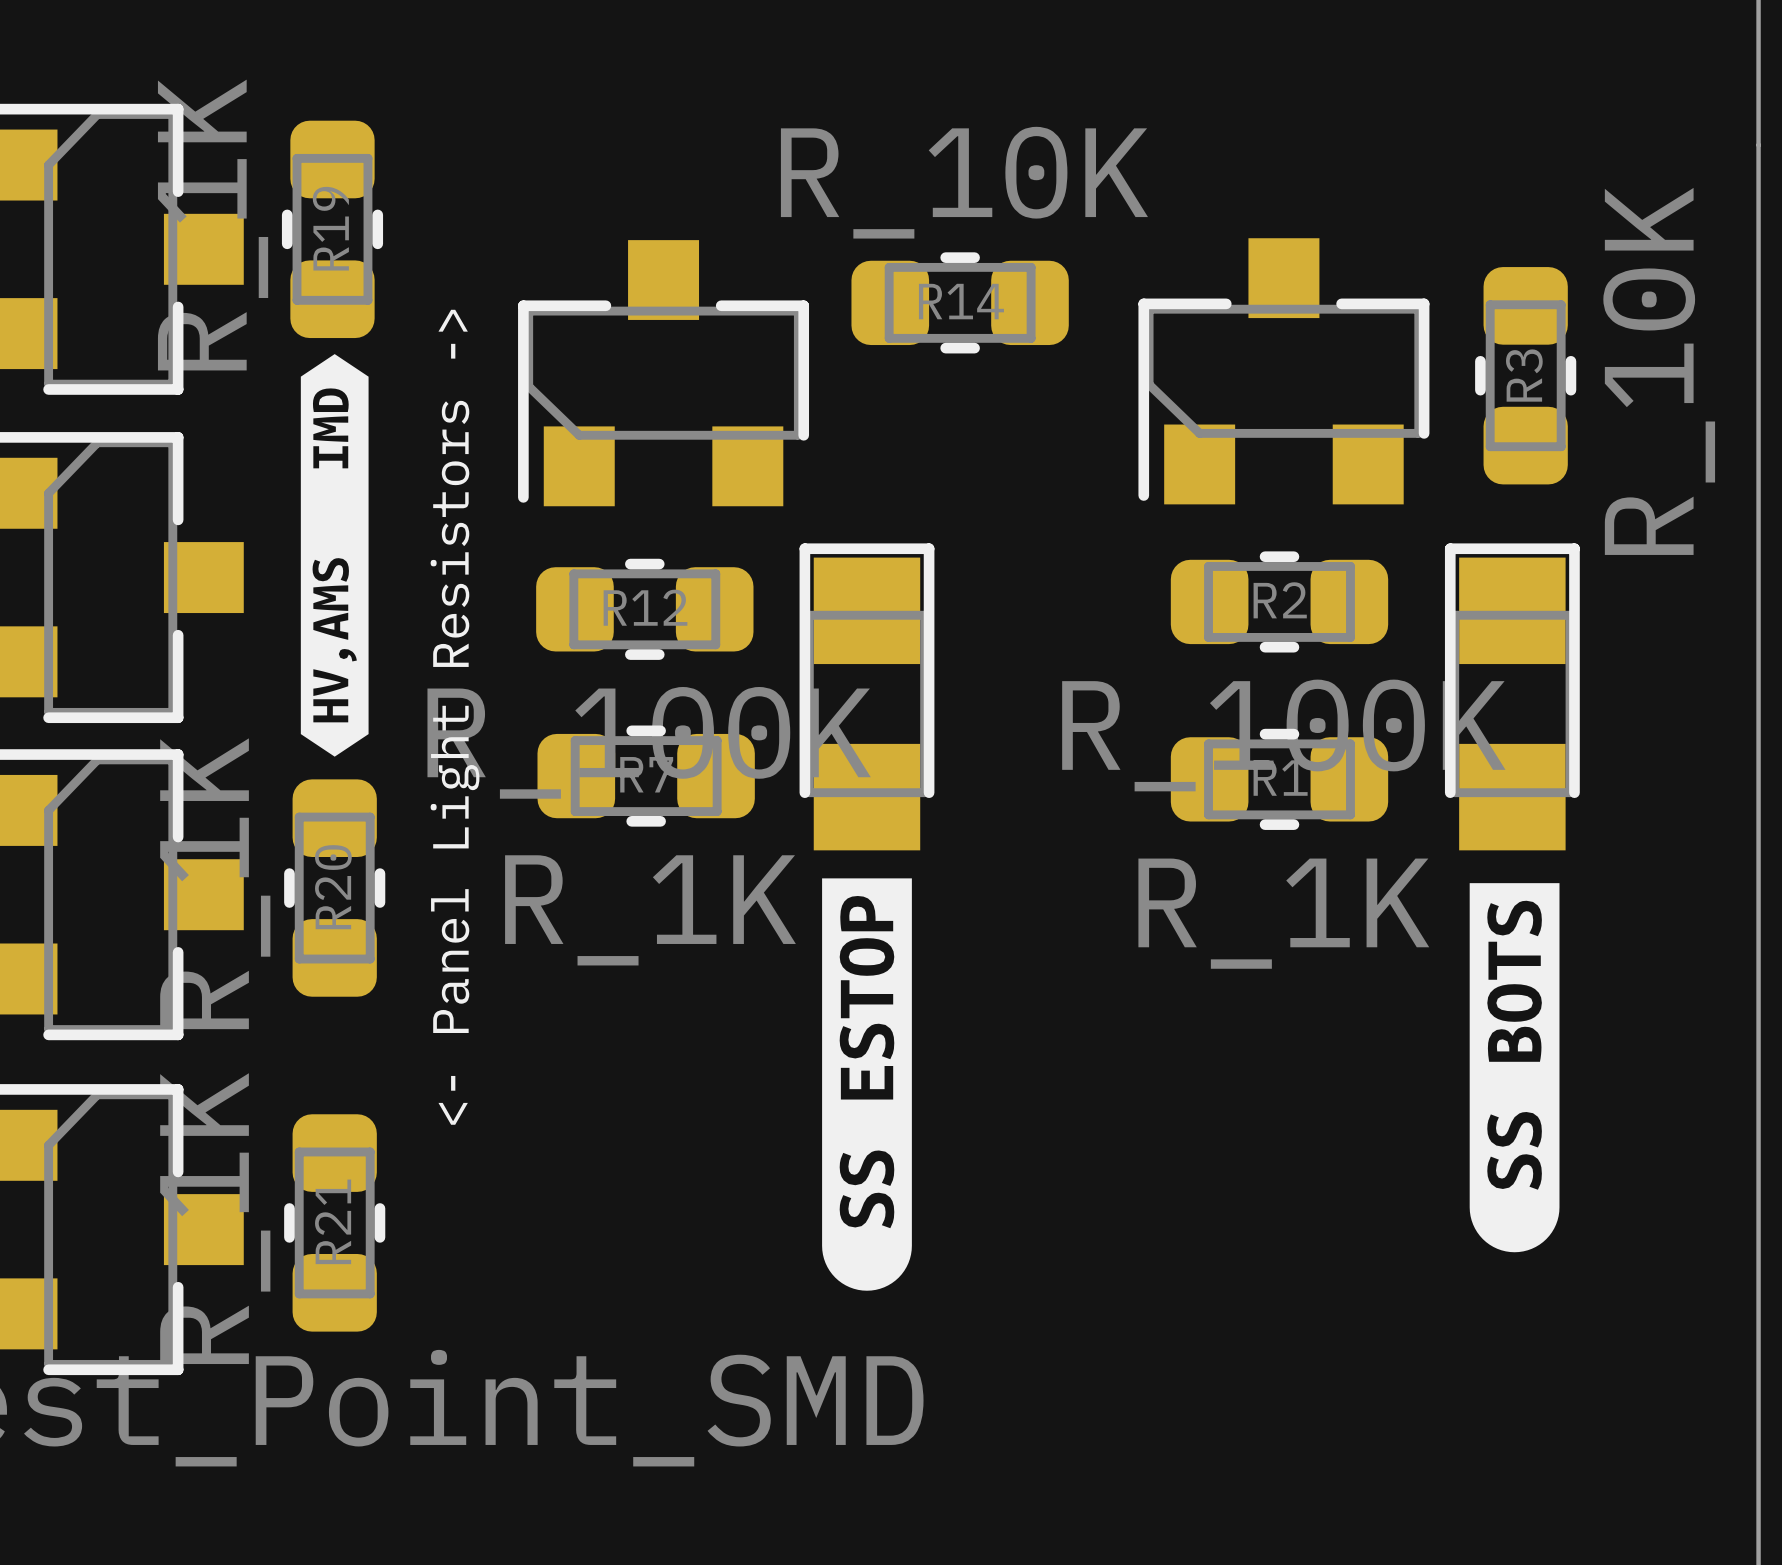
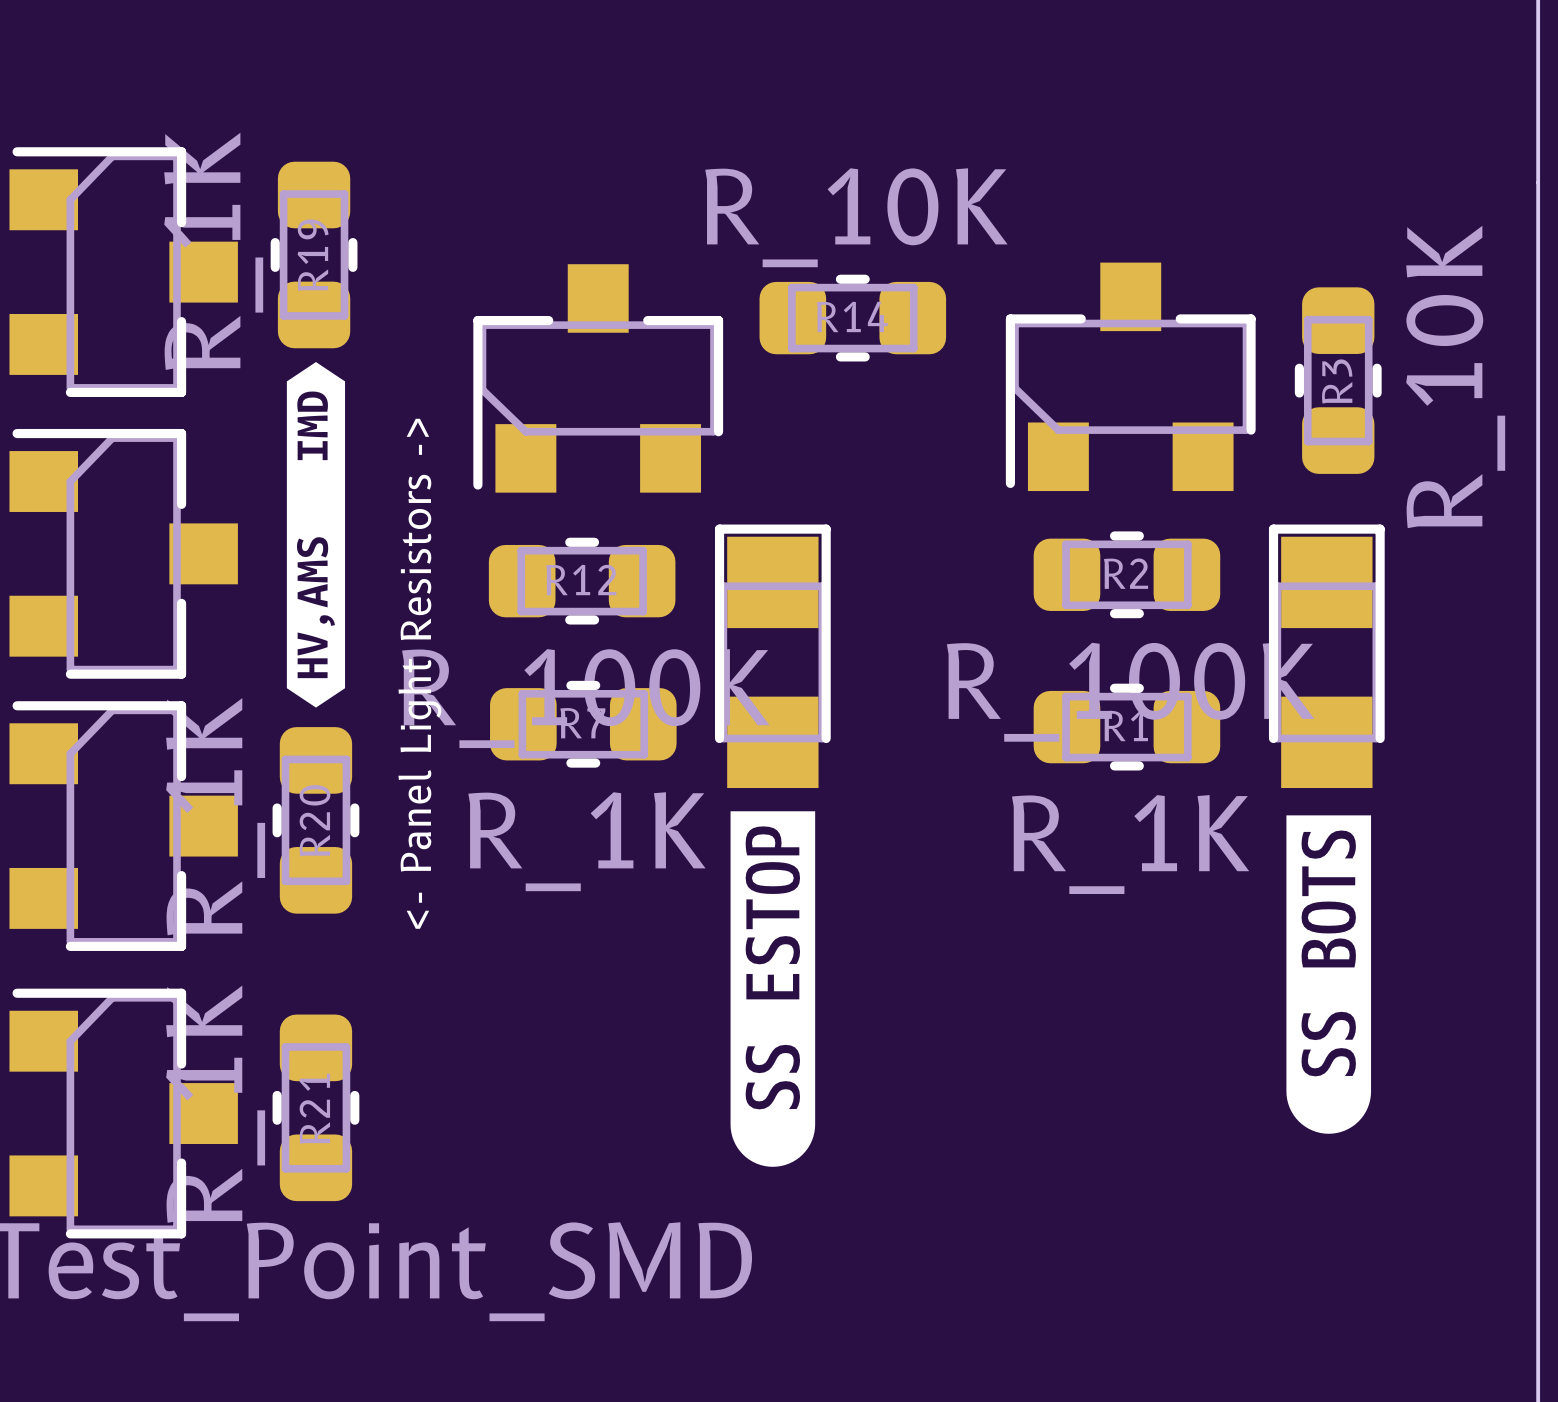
drawing shape: [822, 878, 912, 1291] -> [730, 811, 816, 1167]
drawing shape: [1469, 883, 1560, 1253] -> [1286, 815, 1372, 1134]

